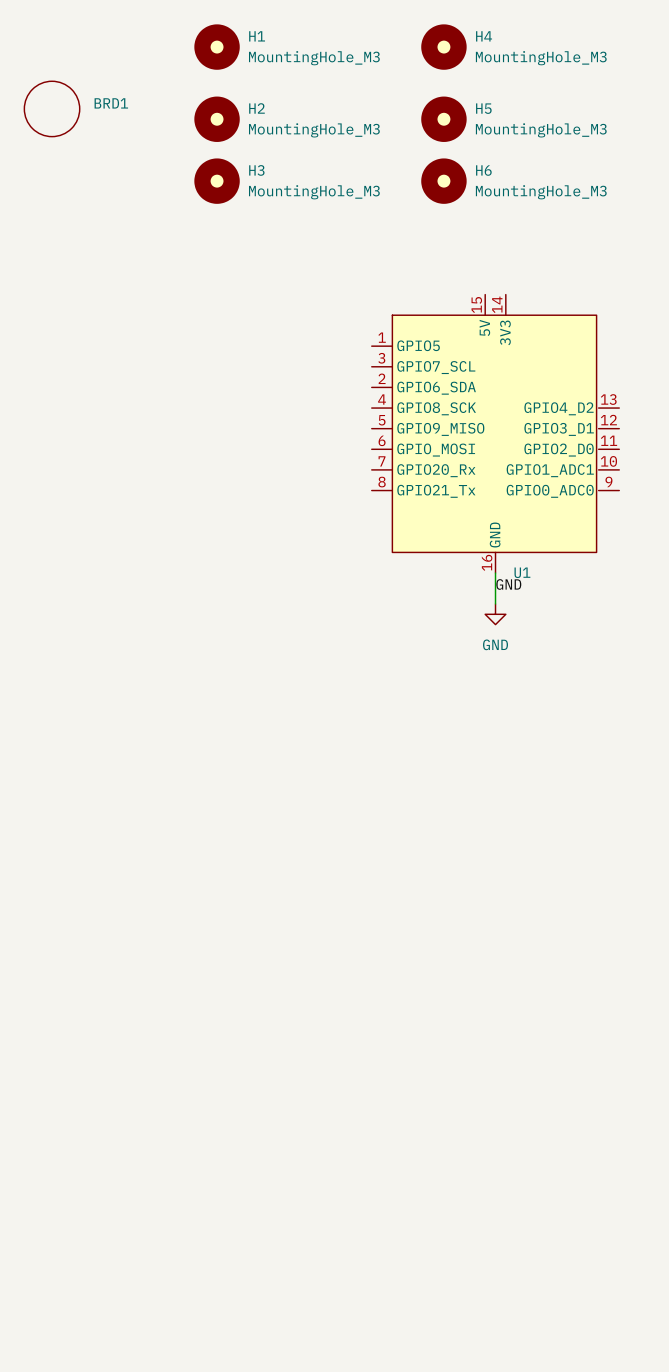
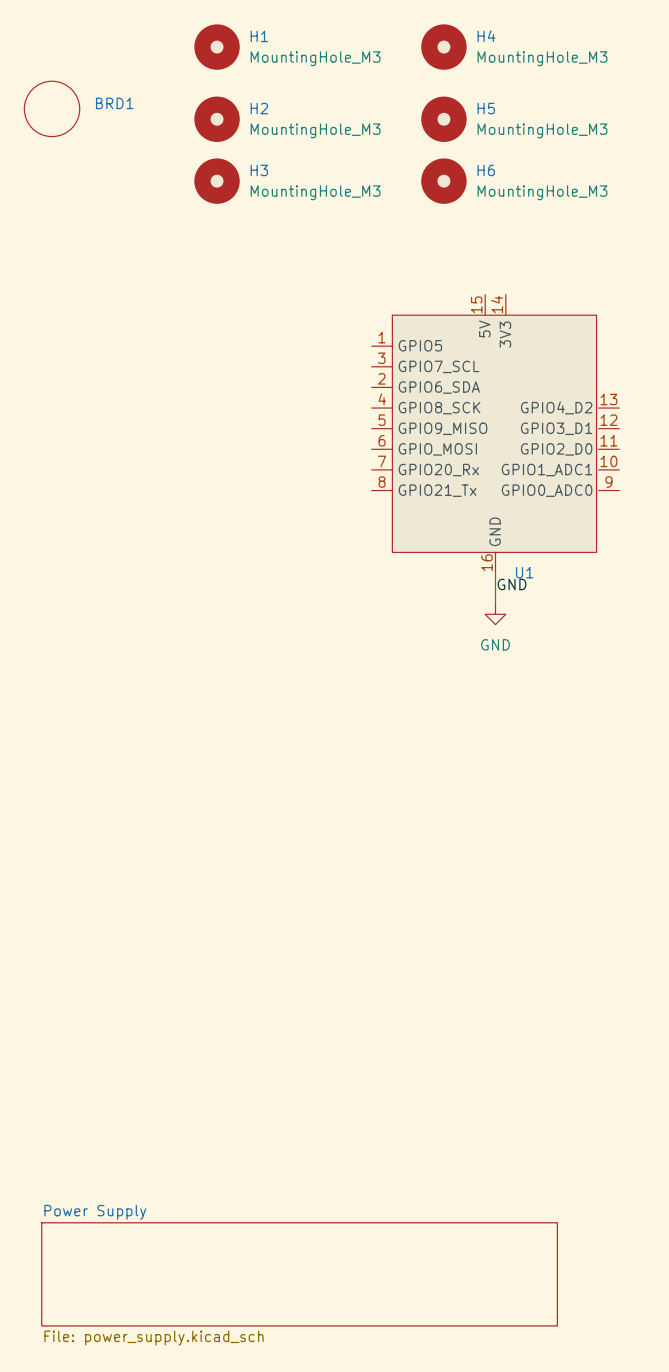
sheet Power Supply: none -> File: power_supply.kicad_sch (299, 1274)

